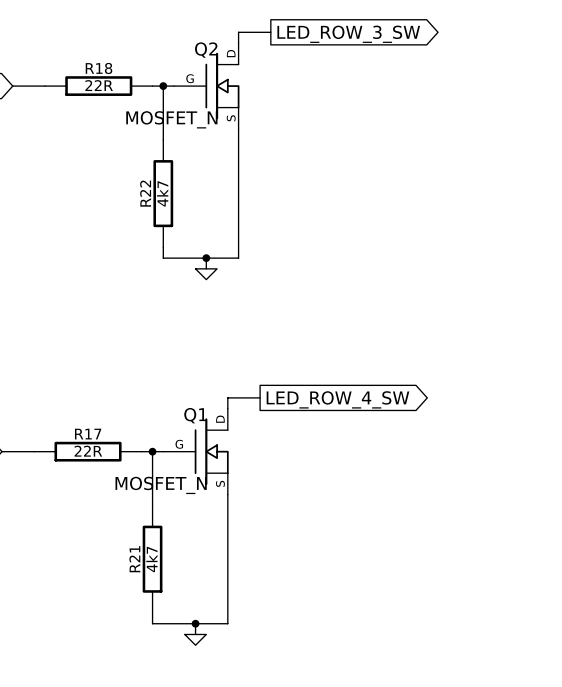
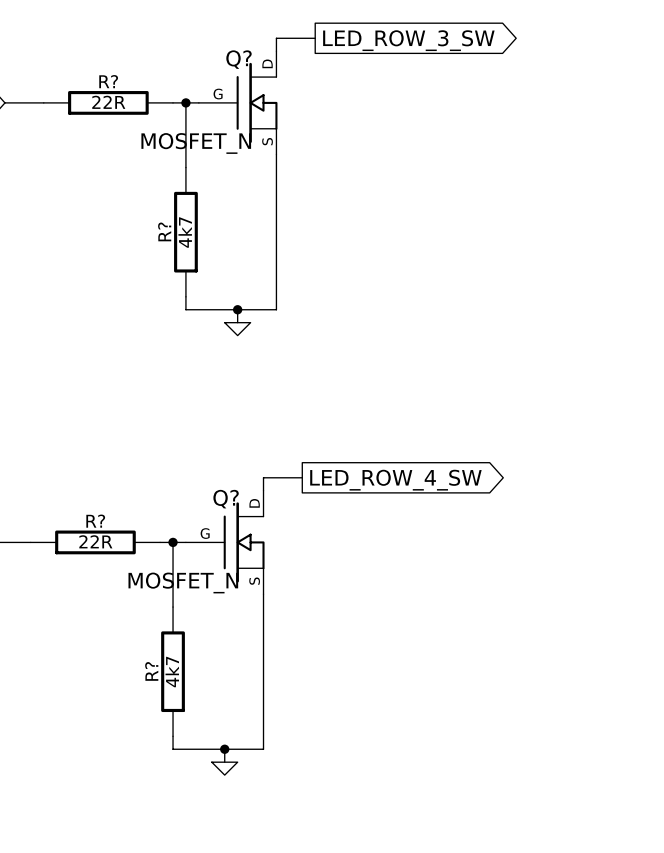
Q2 name: Q2 (206, 50) -> Q? (239, 59)
R18 name: R18 (99, 68) -> R? (108, 81)
R22 name: R22 (145, 193) -> R? (164, 231)
Q1 name: Q1 (195, 415) -> Q? (226, 499)
R17 name: R17 (88, 434) -> R? (95, 521)
R21 name: R21 (134, 559) -> R? (151, 671)

